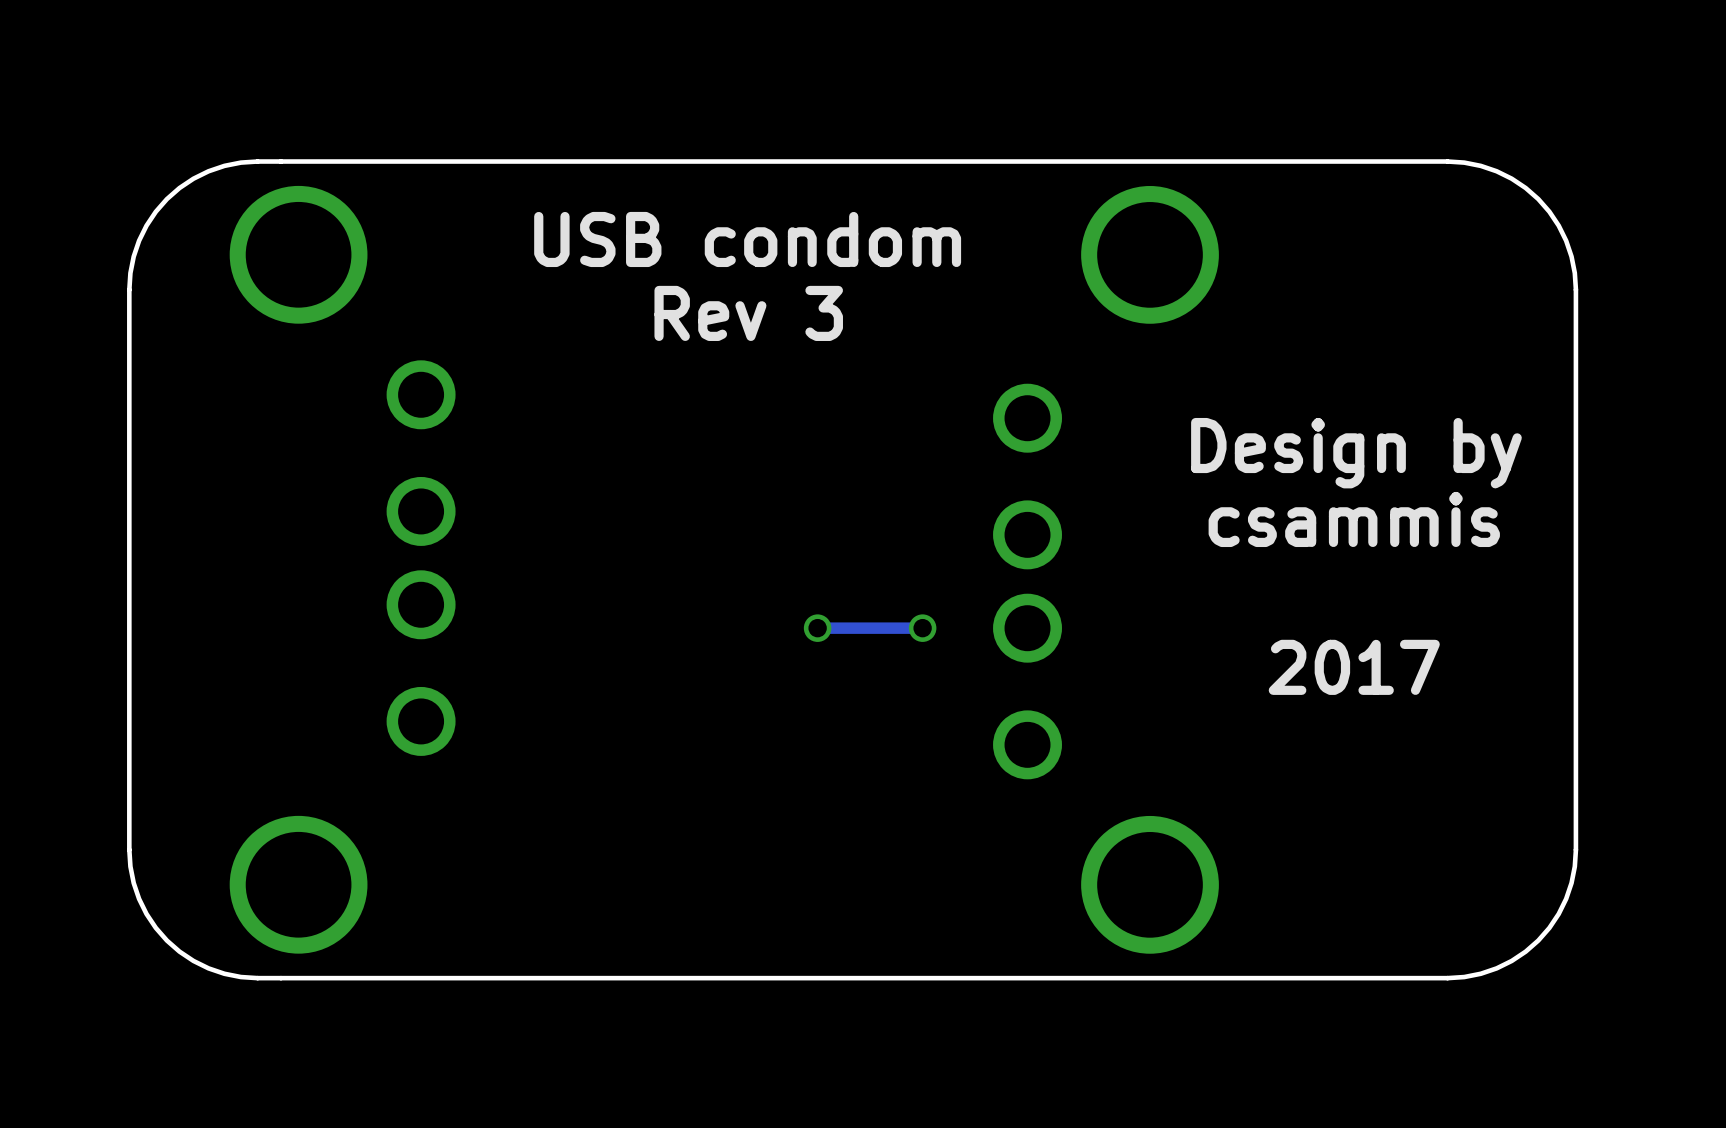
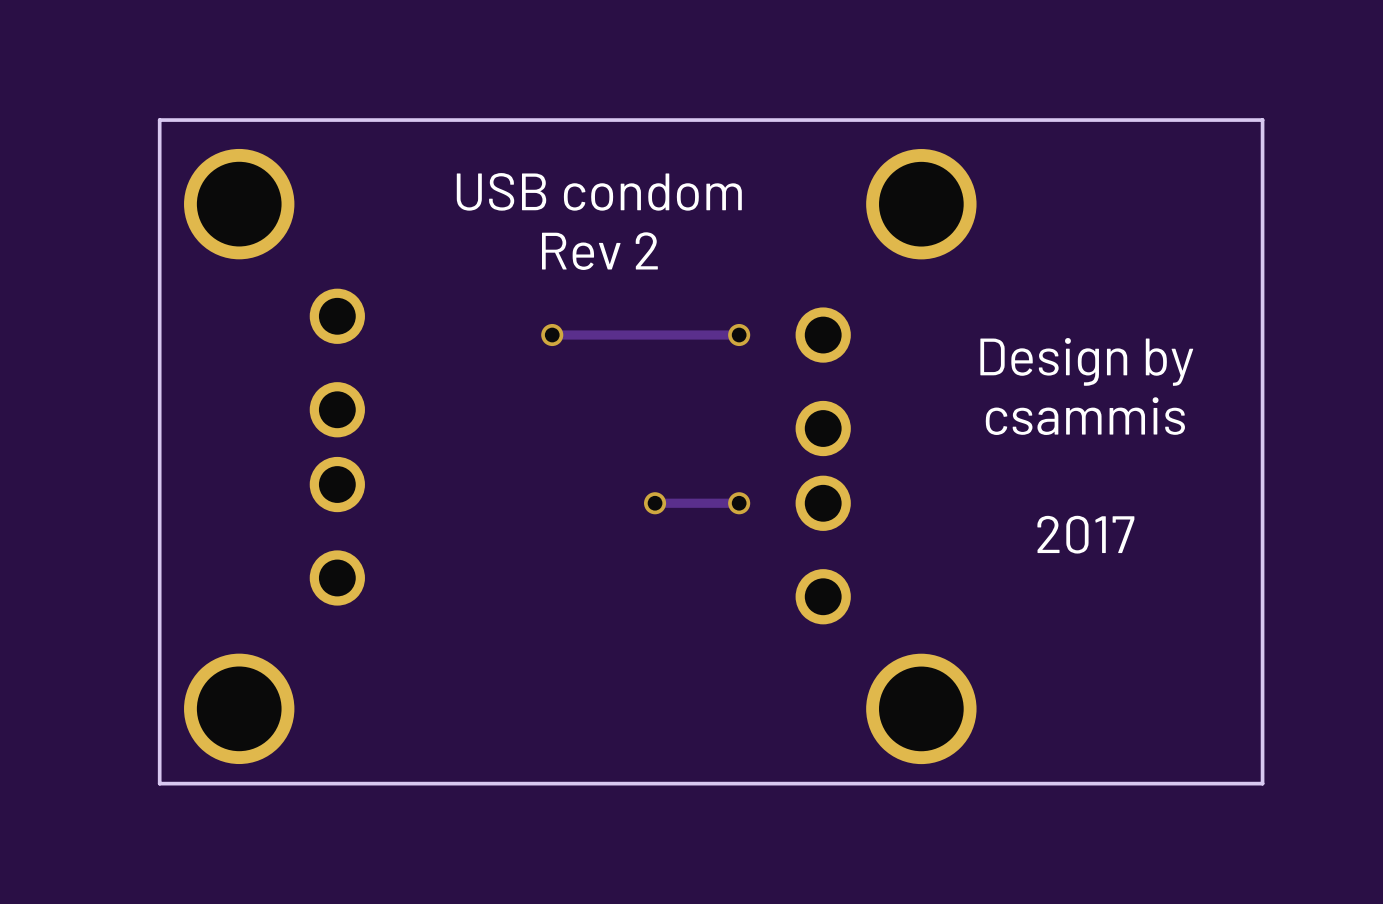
board edge: (1575, 289) (1574, 273) (1566, 240) (1549, 211) (1525, 188) (1511, 178) (1480, 165) (1464, 162) (257, 161) (224, 165) (193, 178) (179, 188) (155, 211) (139, 240) (130, 273) (130, 866) (133, 883) (146, 913) (166, 940) (179, 951) (208, 968) (240, 977) (257, 978) -> (1262, 232) (1262, 120) (159, 120) (159, 783) (206, 783)
text: Rev 3 (748, 313) -> Rev 2 (599, 251)
via: none -> (552, 335)
track: none -> (739, 335) (552, 335)
via: none -> (739, 335)
board edge: (1575, 849) (1571, 883) (1566, 898) (1558, 913) (1538, 940) (1525, 951) (1496, 968) (1464, 977) (1447, 978) -> (1262, 680) (1262, 783) (1159, 783)

